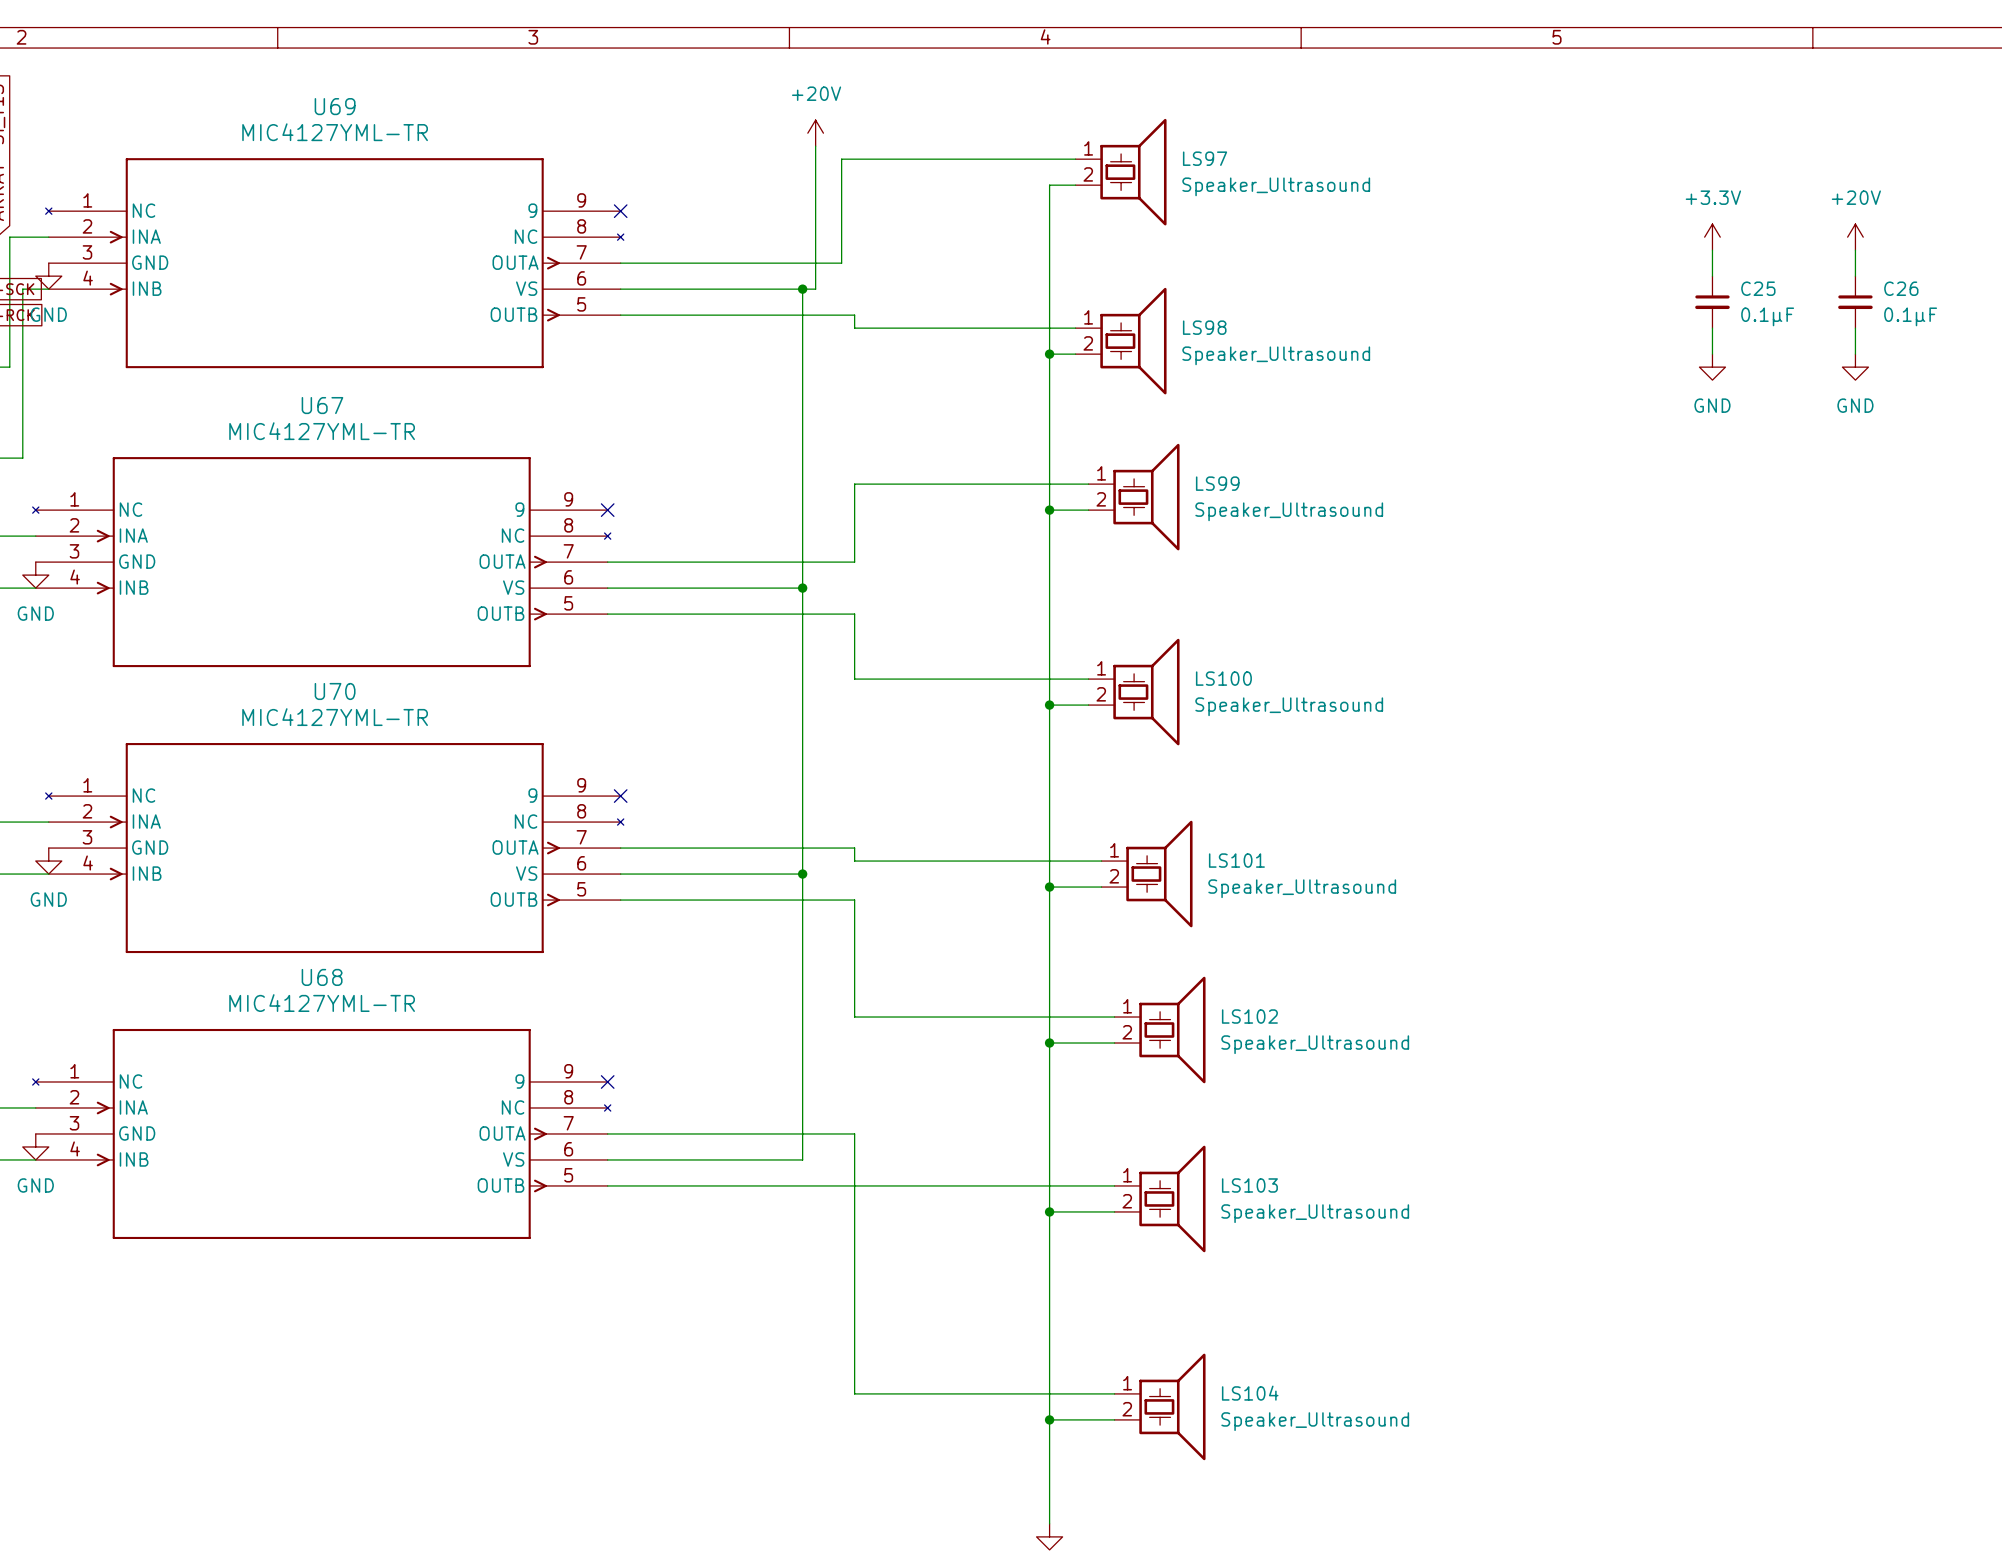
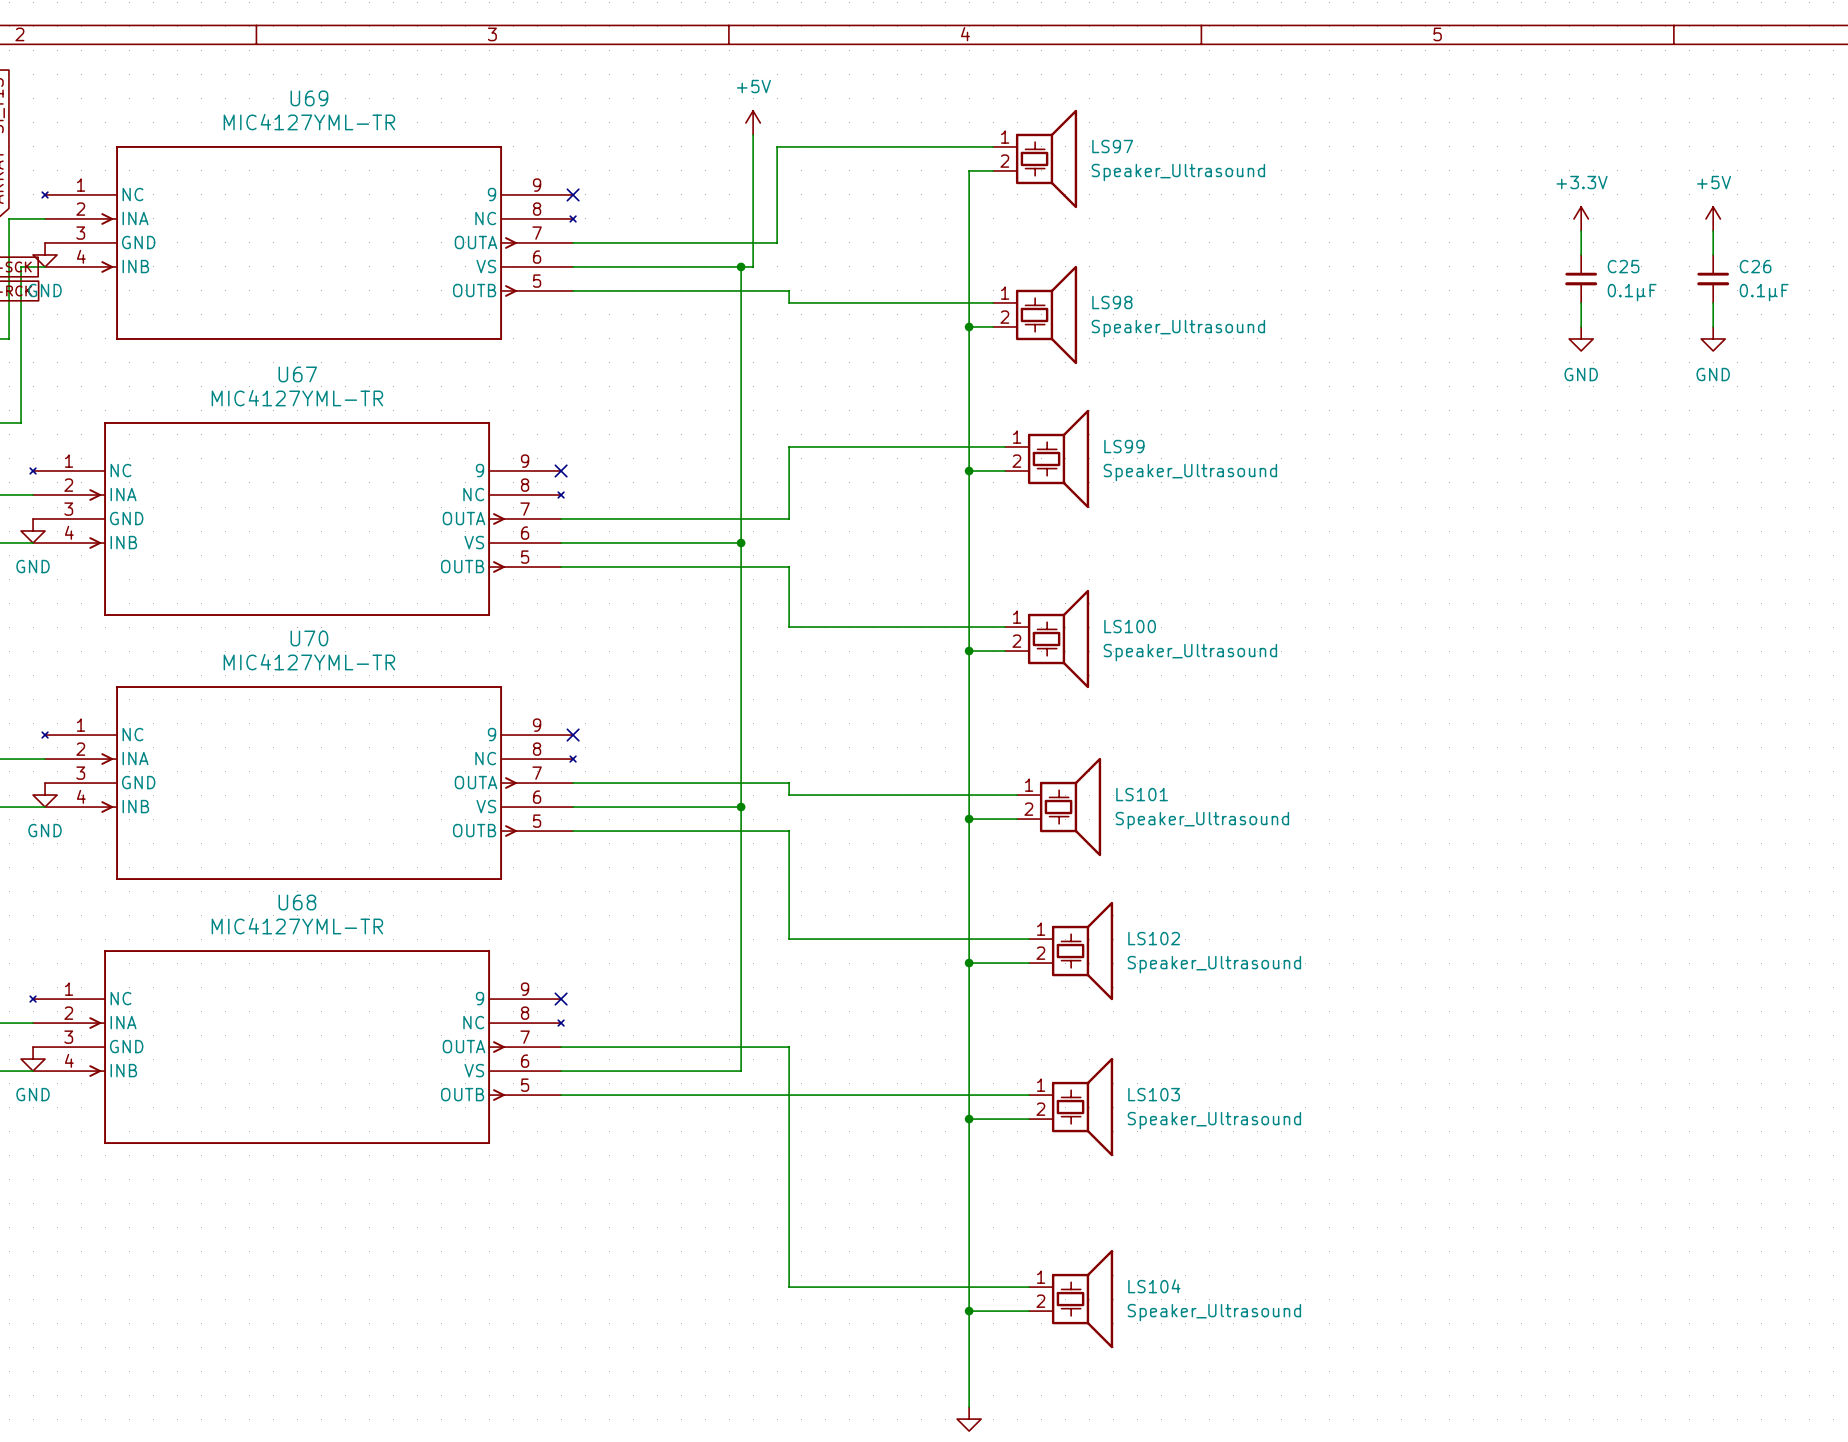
power symbol: +20V (815, 133) -> +5V (753, 122)
power symbol: +20V (1855, 237) -> +5V (1713, 218)

